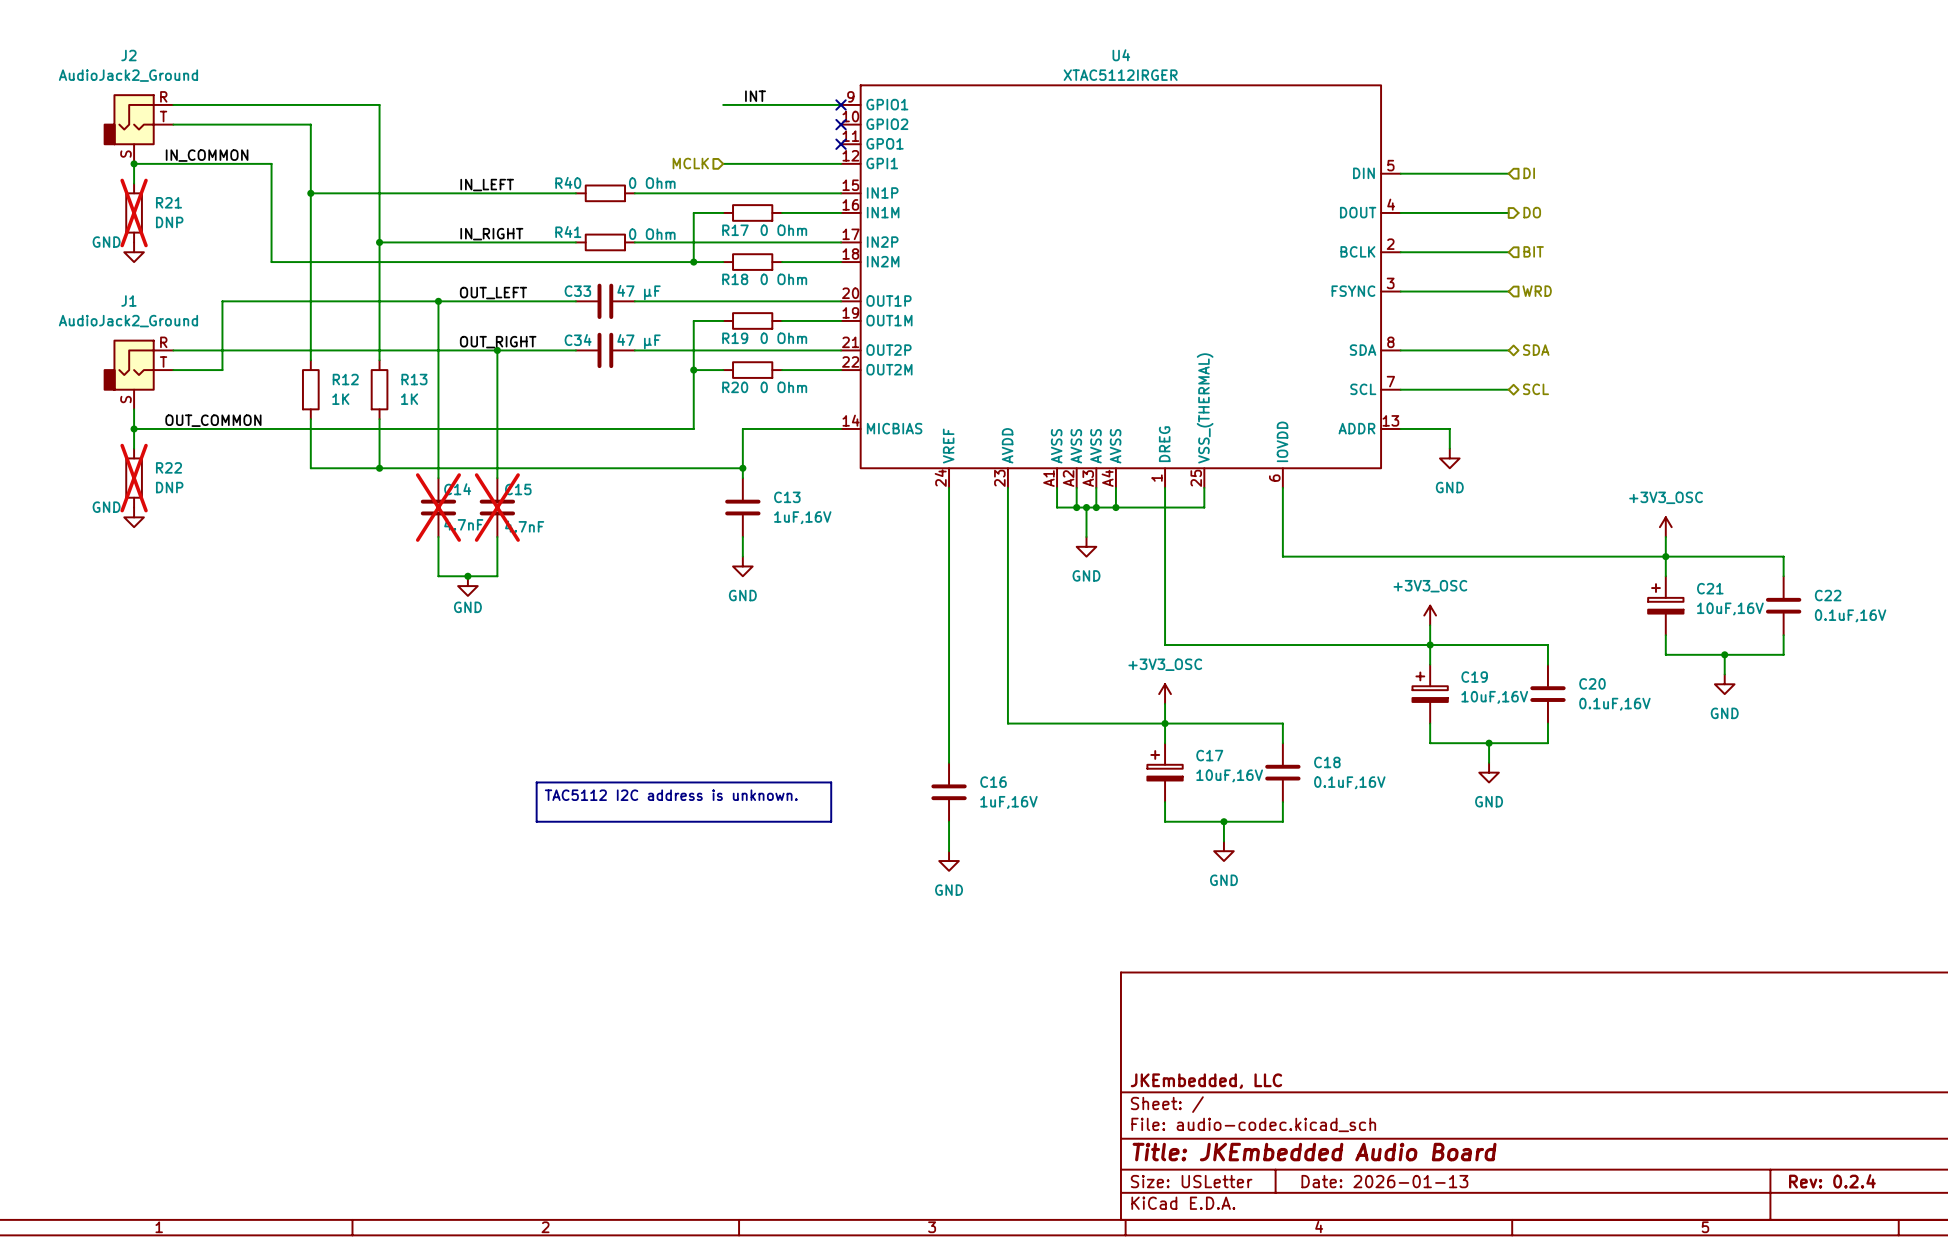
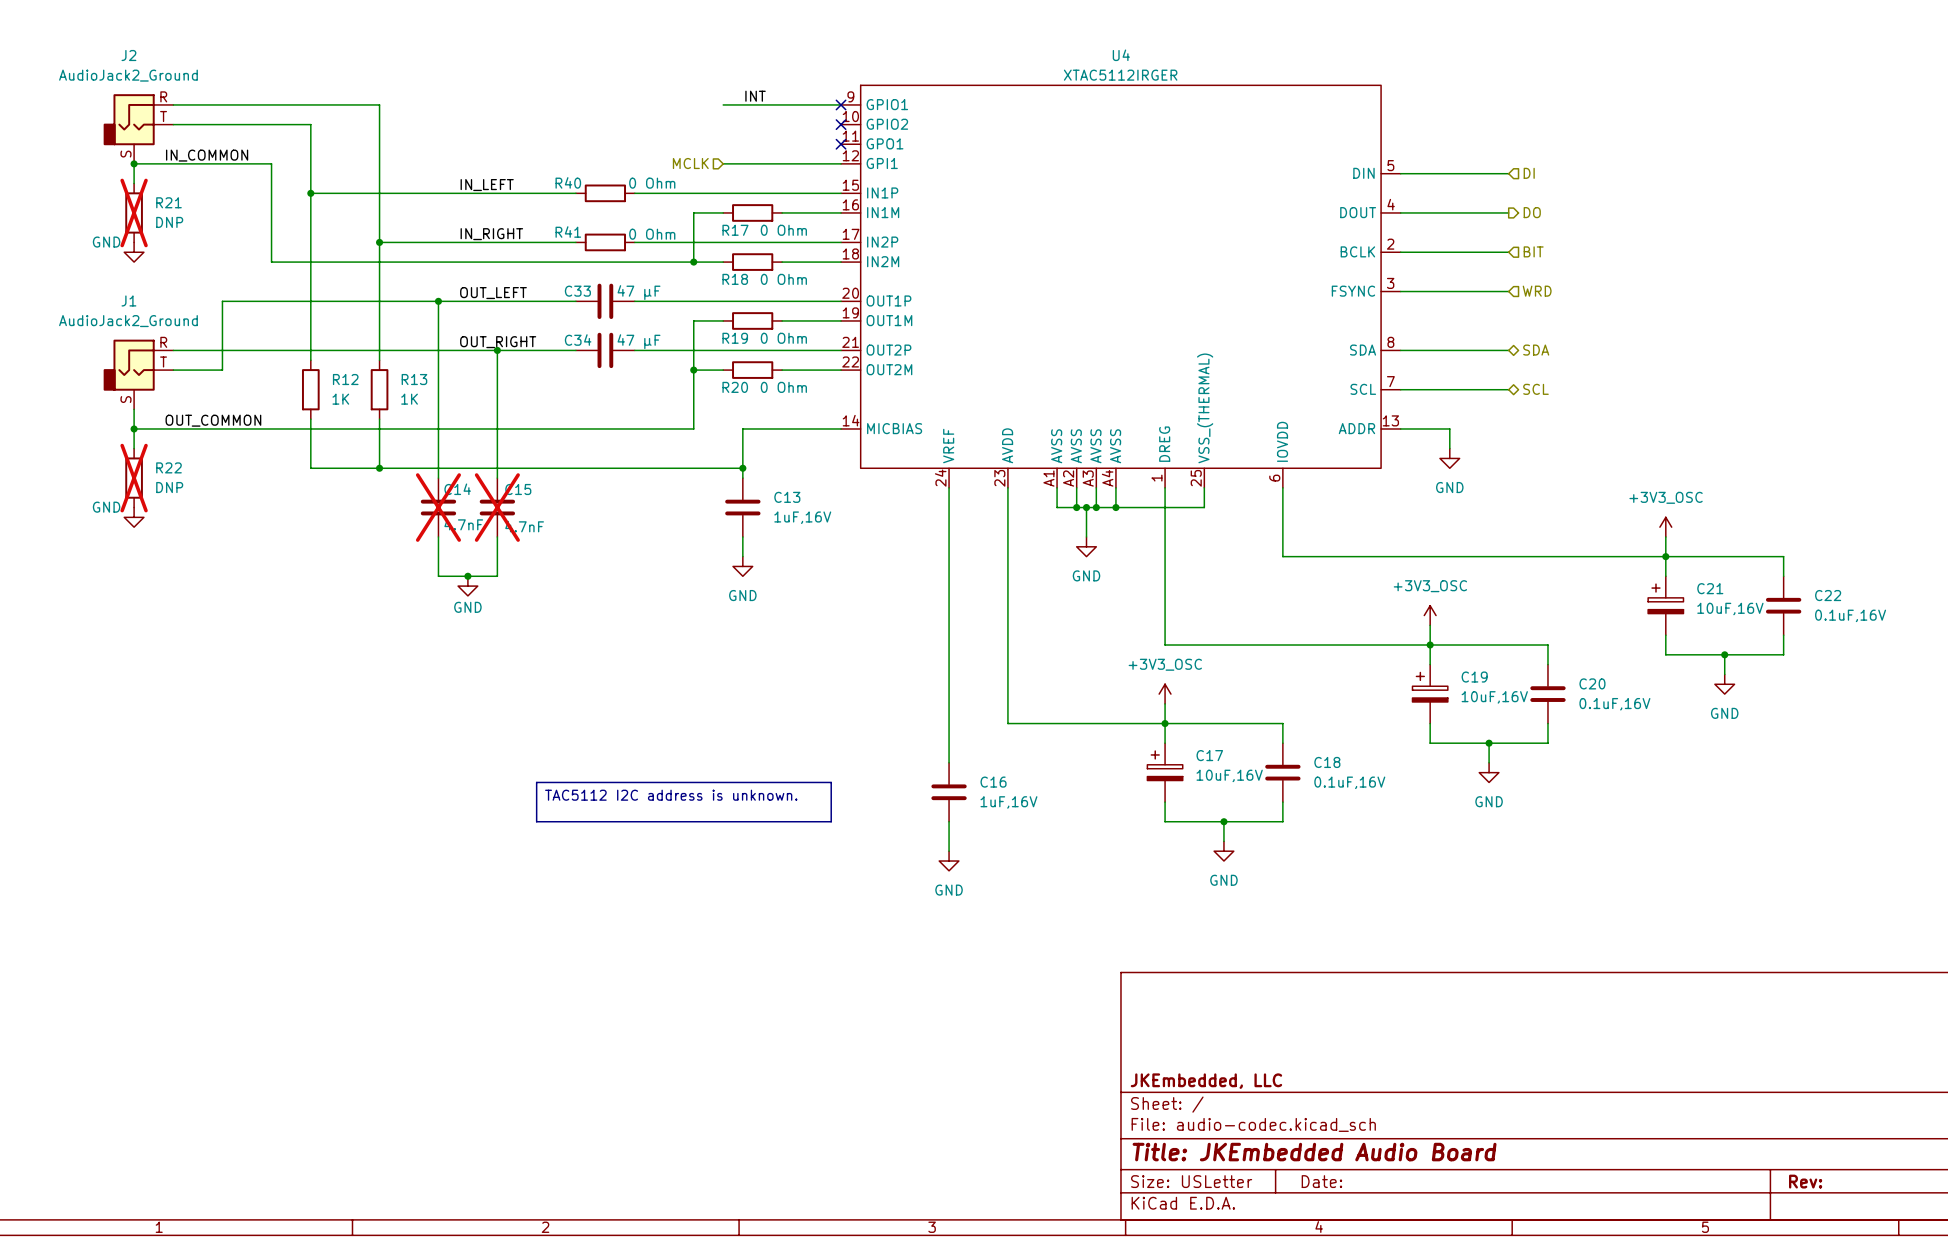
title block: Date: 2026-01-13 (1384, 1181) -> Date: (1321, 1181)
title block: Rev: 0.2.4 (1832, 1181) -> Rev: (1805, 1181)

